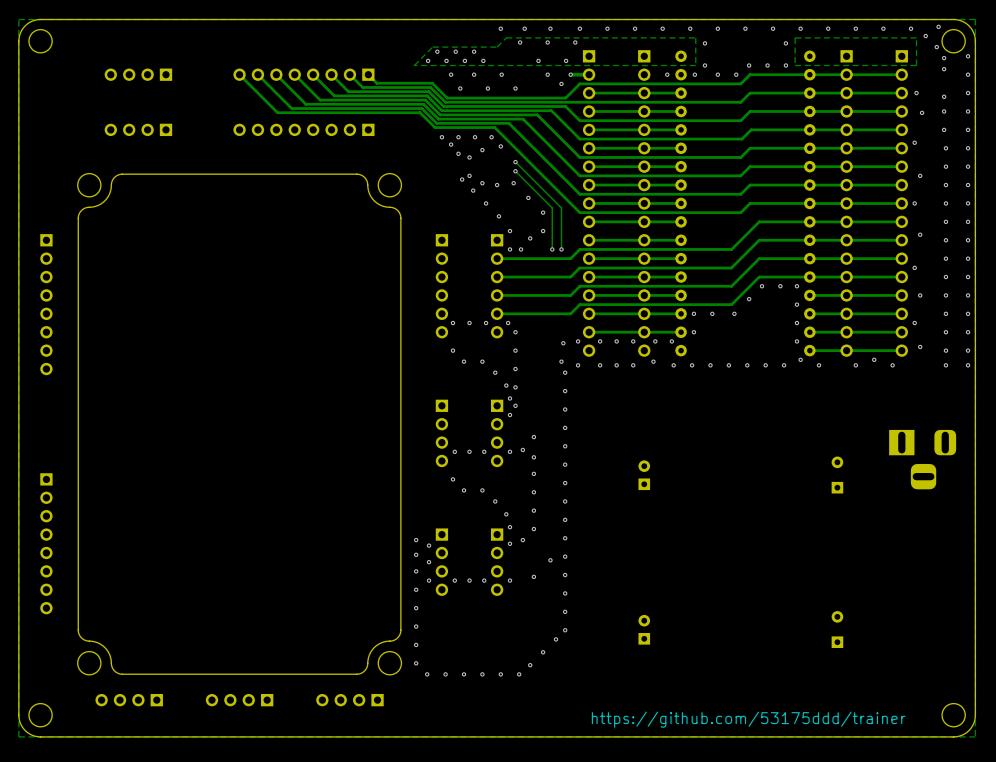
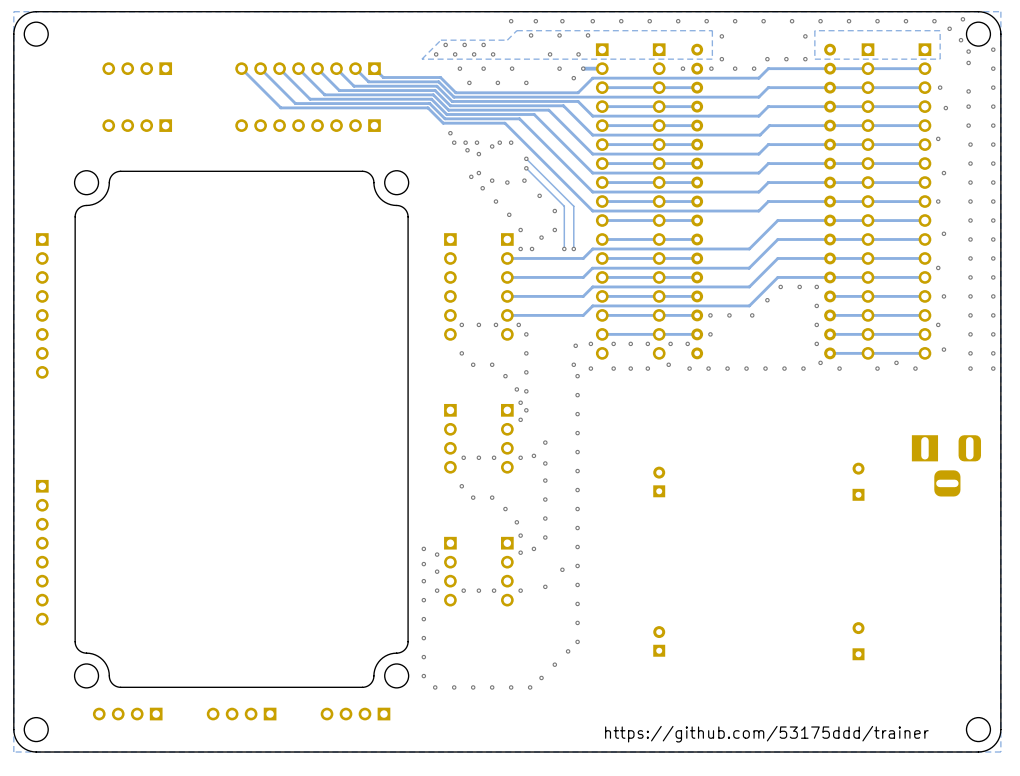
via: (458, 137) -> none
via: (475, 137) -> none
via: (491, 137) -> none
via: (451, 144) -> none
via: none -> (454, 142)
via: none -> (465, 142)
via: none -> (476, 142)
via: none -> (499, 142)

